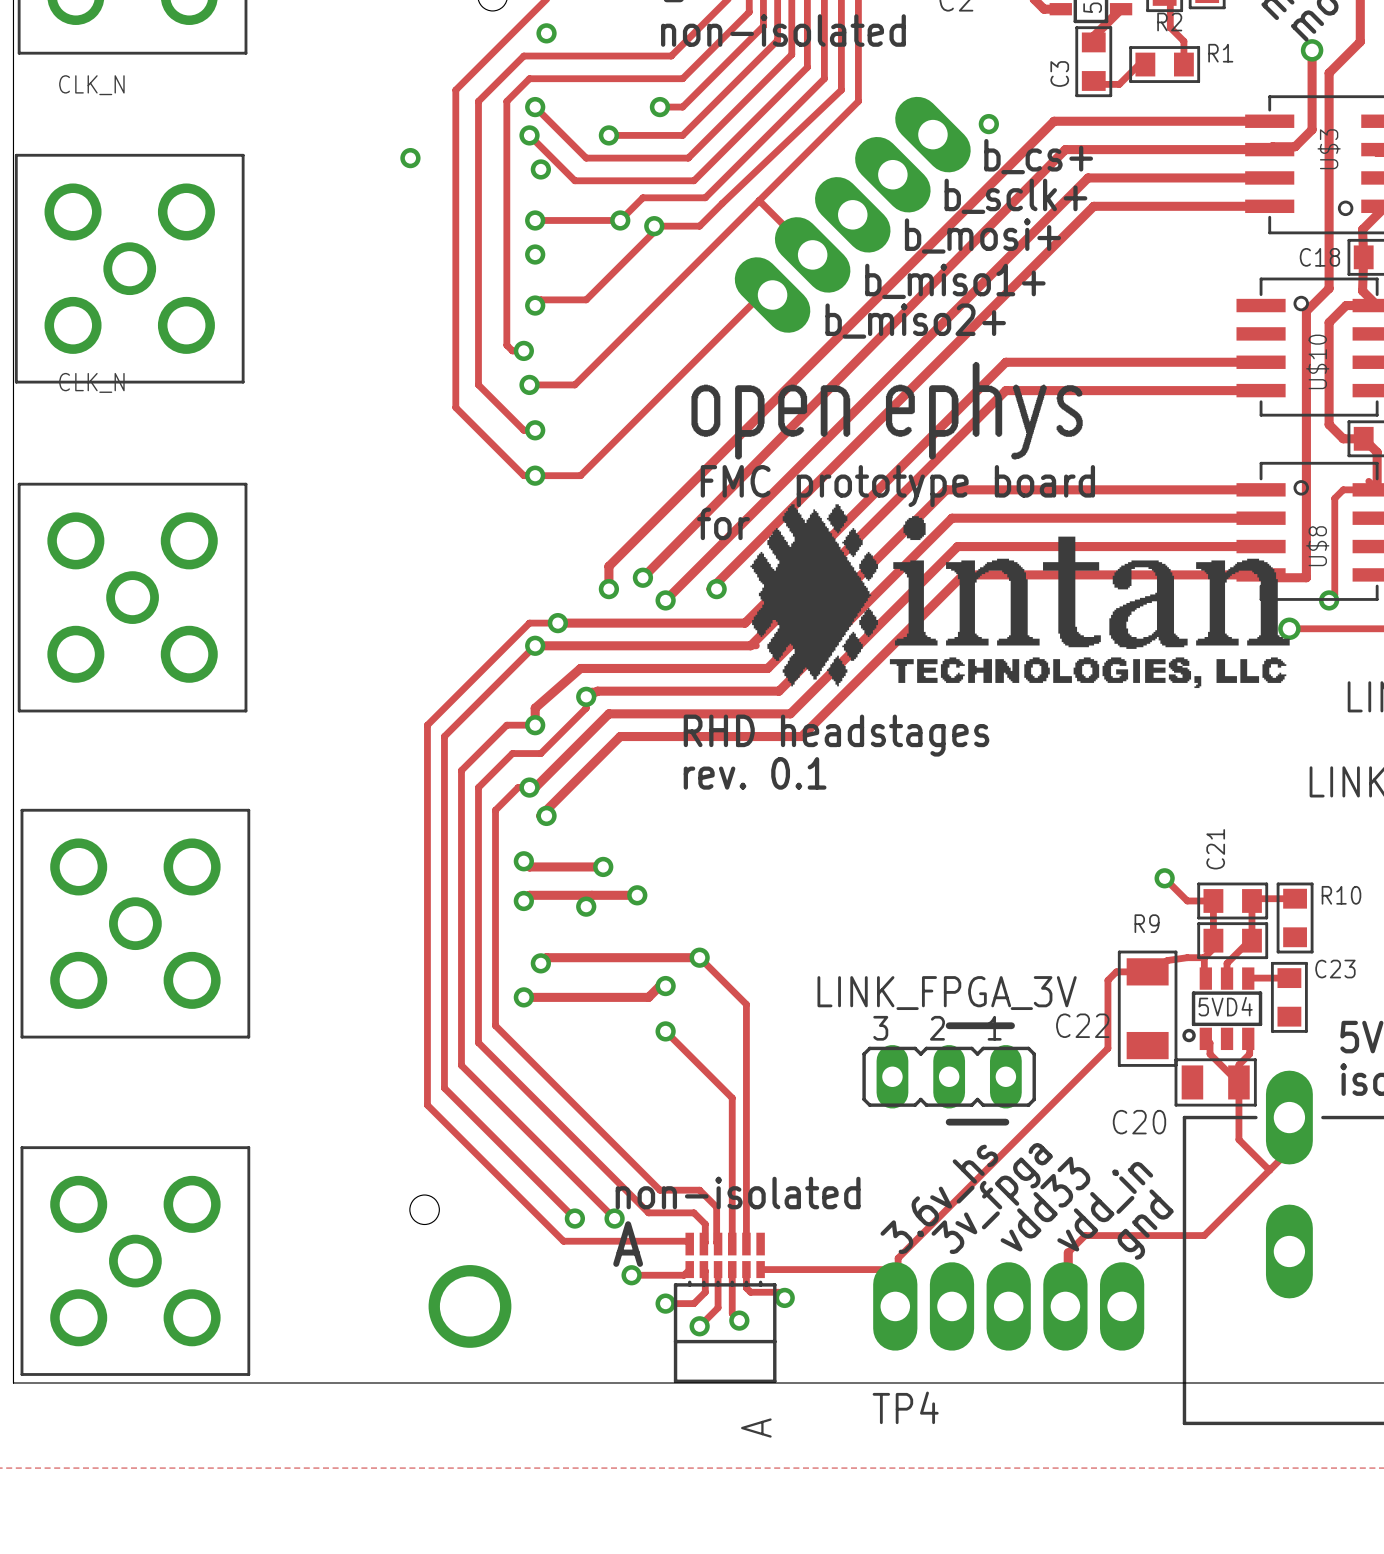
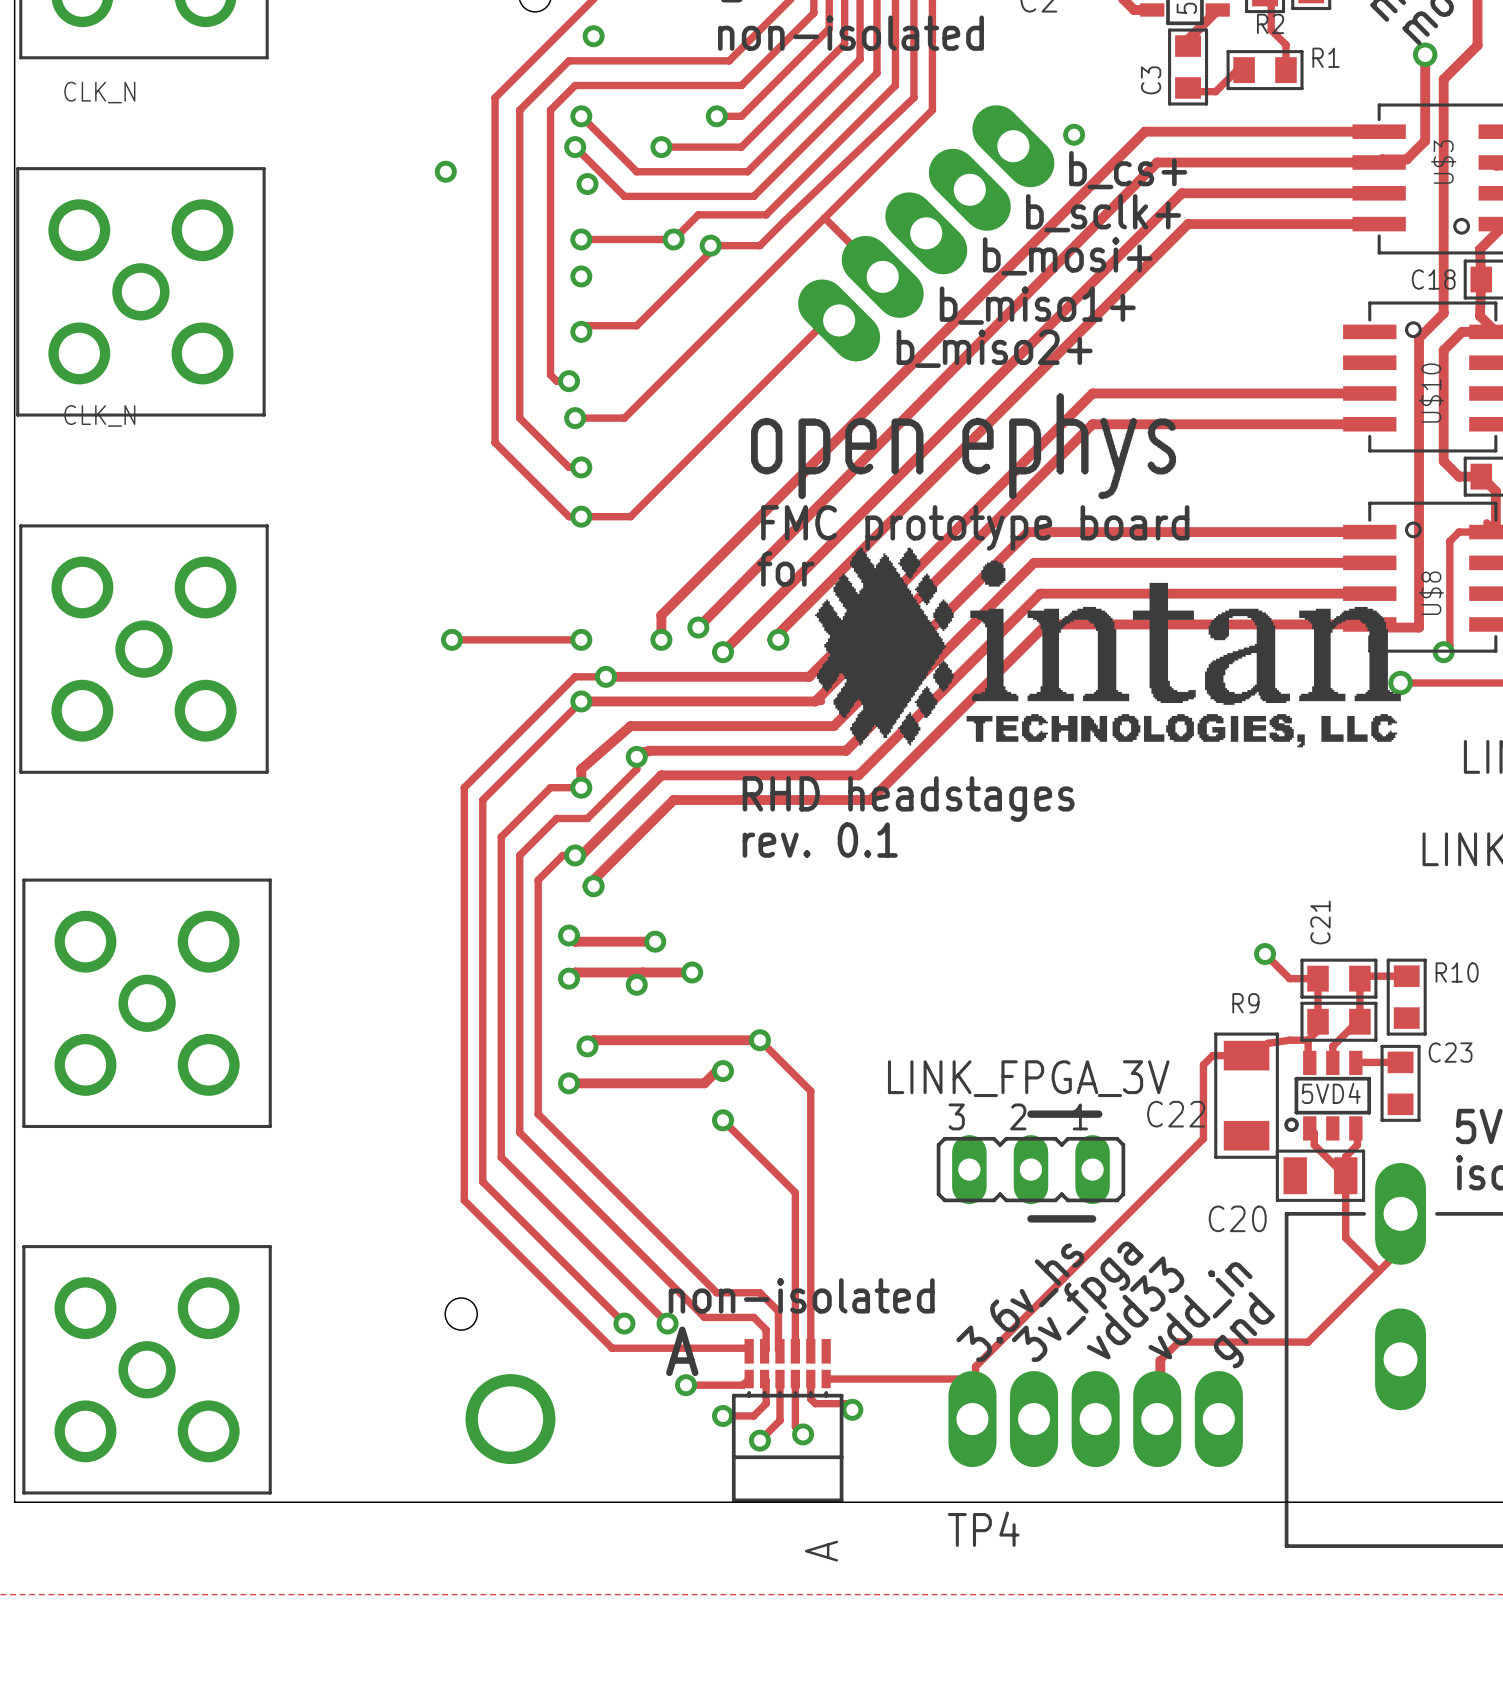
track: none -> (451, 639) (581, 639)
via: none -> (451, 639)
via: none -> (581, 639)

